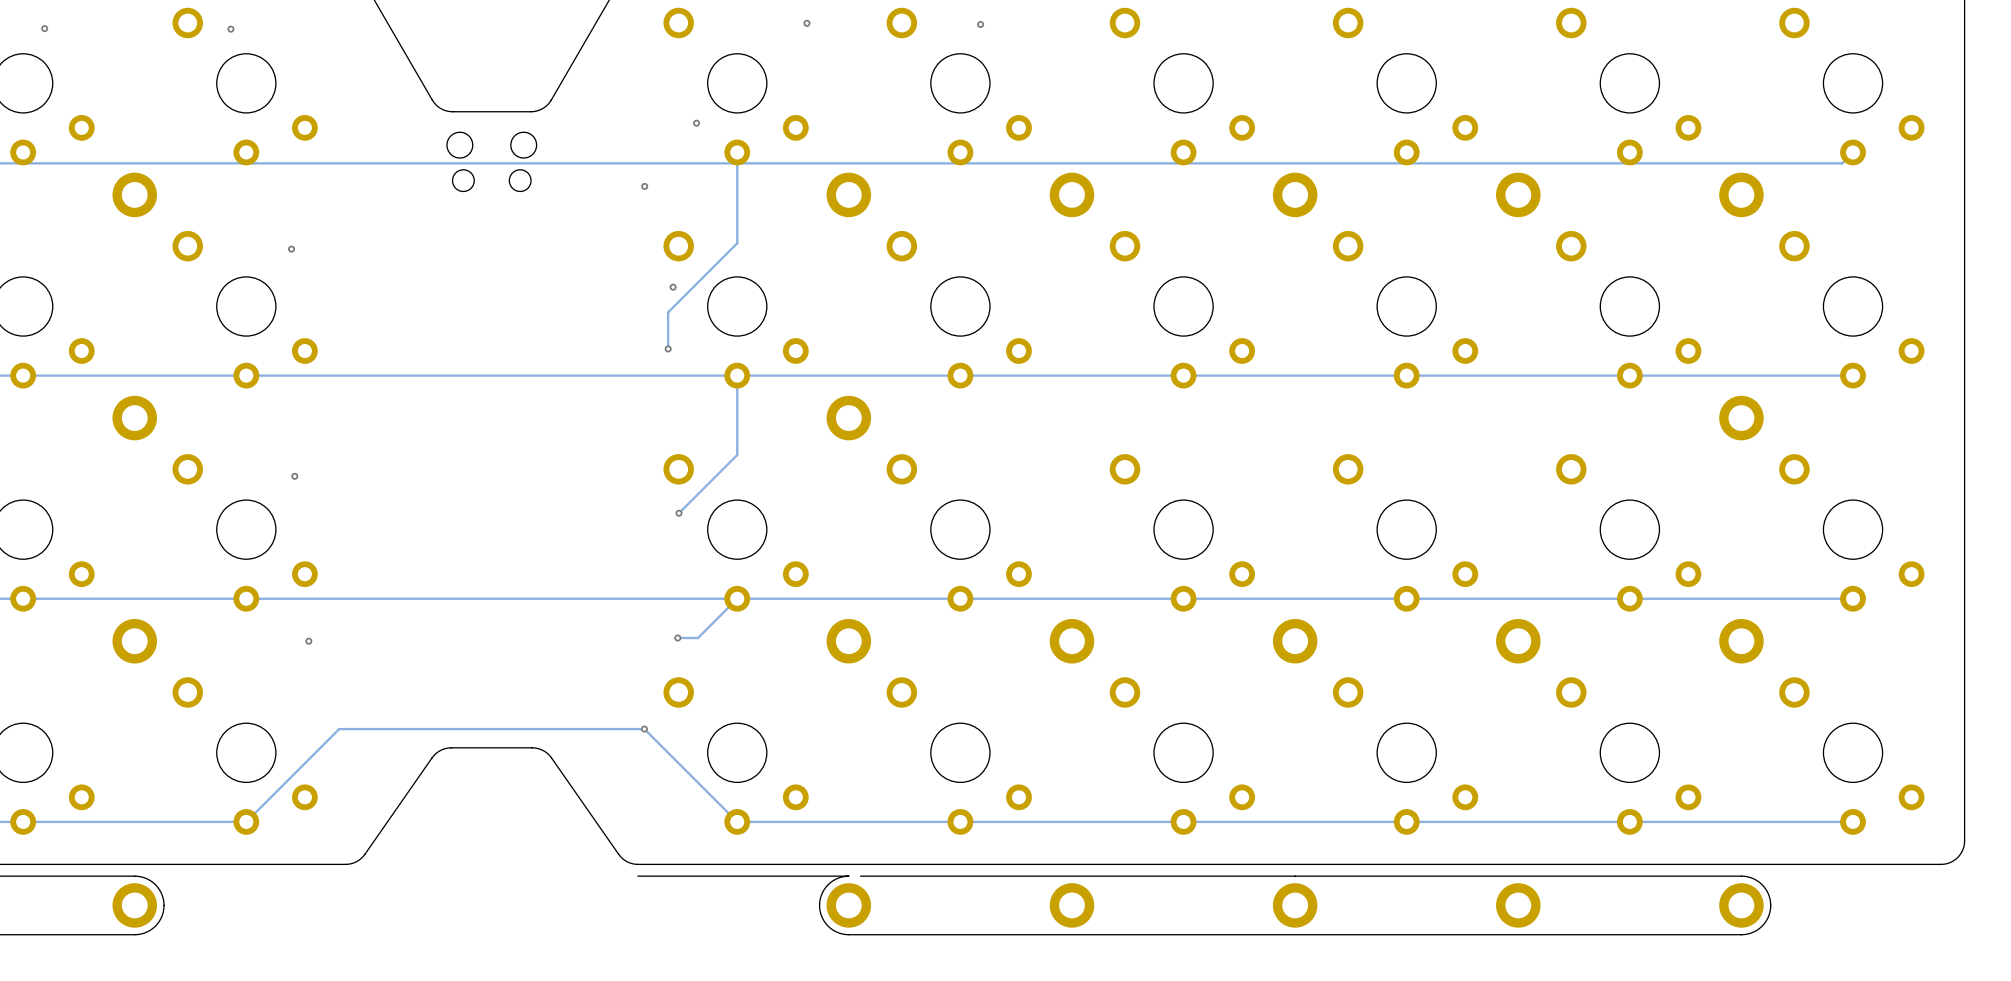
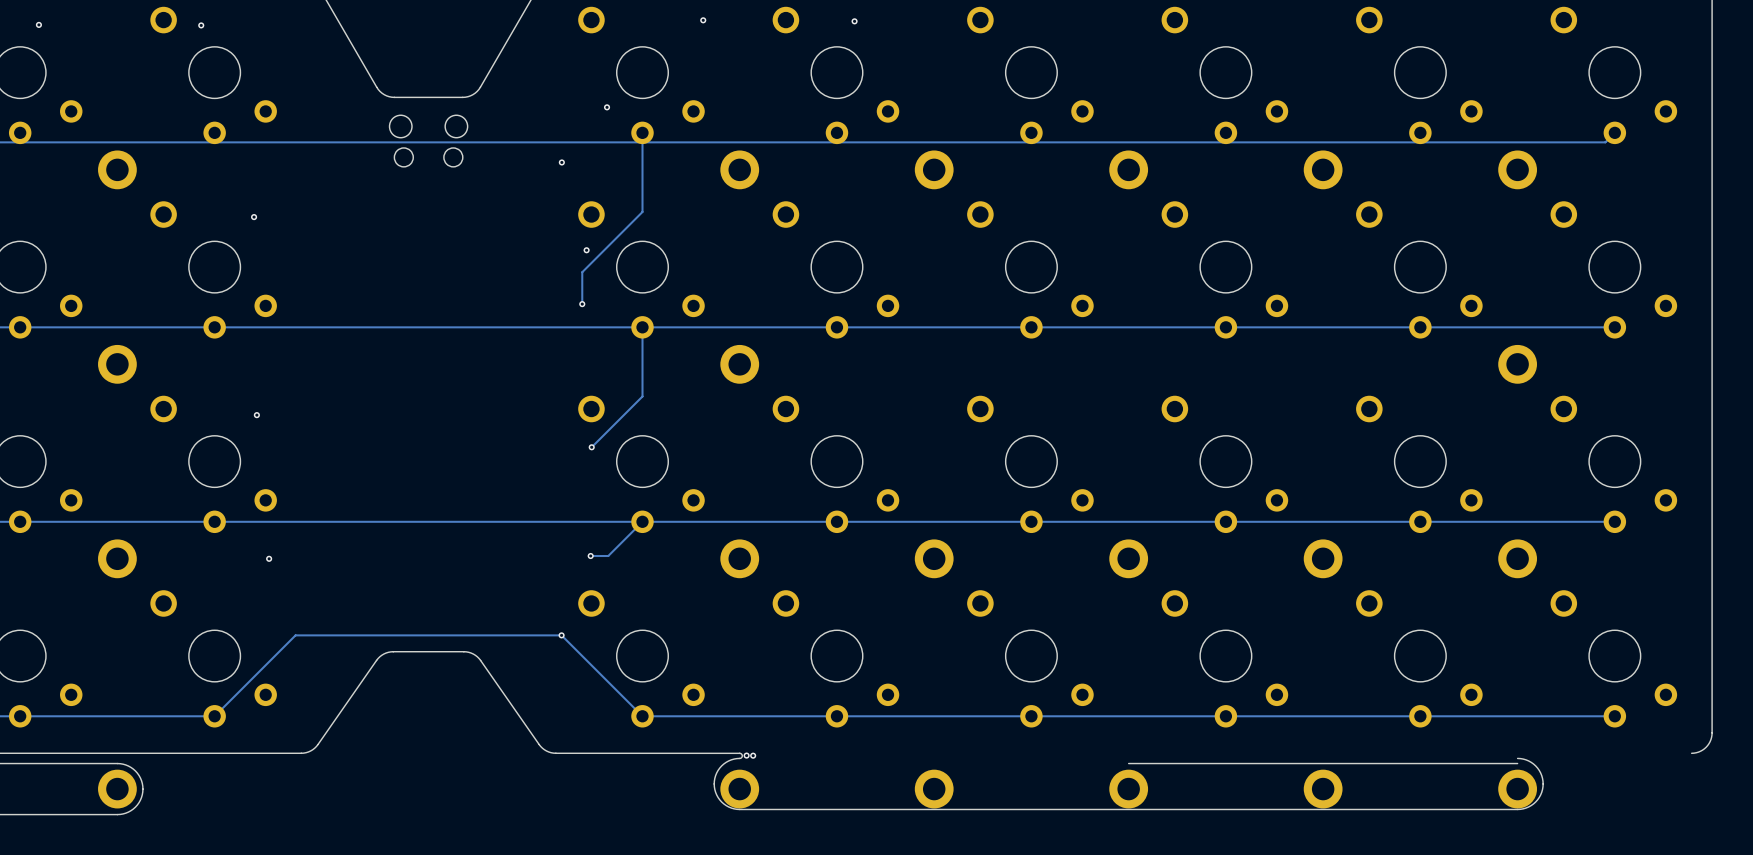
board edge: (637, 864) (1941, 864) -> (555, 753) (740, 753) (742, 755) (741, 757) (728, 760) (719, 768) (714, 783) (715, 792) (721, 802) (731, 808) (739, 809) (1520, 809) (1528, 806) (1537, 799) (1541, 792) (1542, 781) (1535, 765) (1528, 760) (1517, 758)
via: none -> (746, 755)
via: none -> (753, 755)
board edge: (1295, 876) (860, 876) -> none
board edge: (1741, 876) (1751, 877) (1762, 884) (1767, 892) (1770, 905) (1769, 915) (1762, 926) (1751, 933) (1741, 934) (848, 934) (839, 933) (828, 926) (821, 915) (819, 905) (822, 892) (828, 884) (839, 877) (848, 876) (637, 876) -> none

